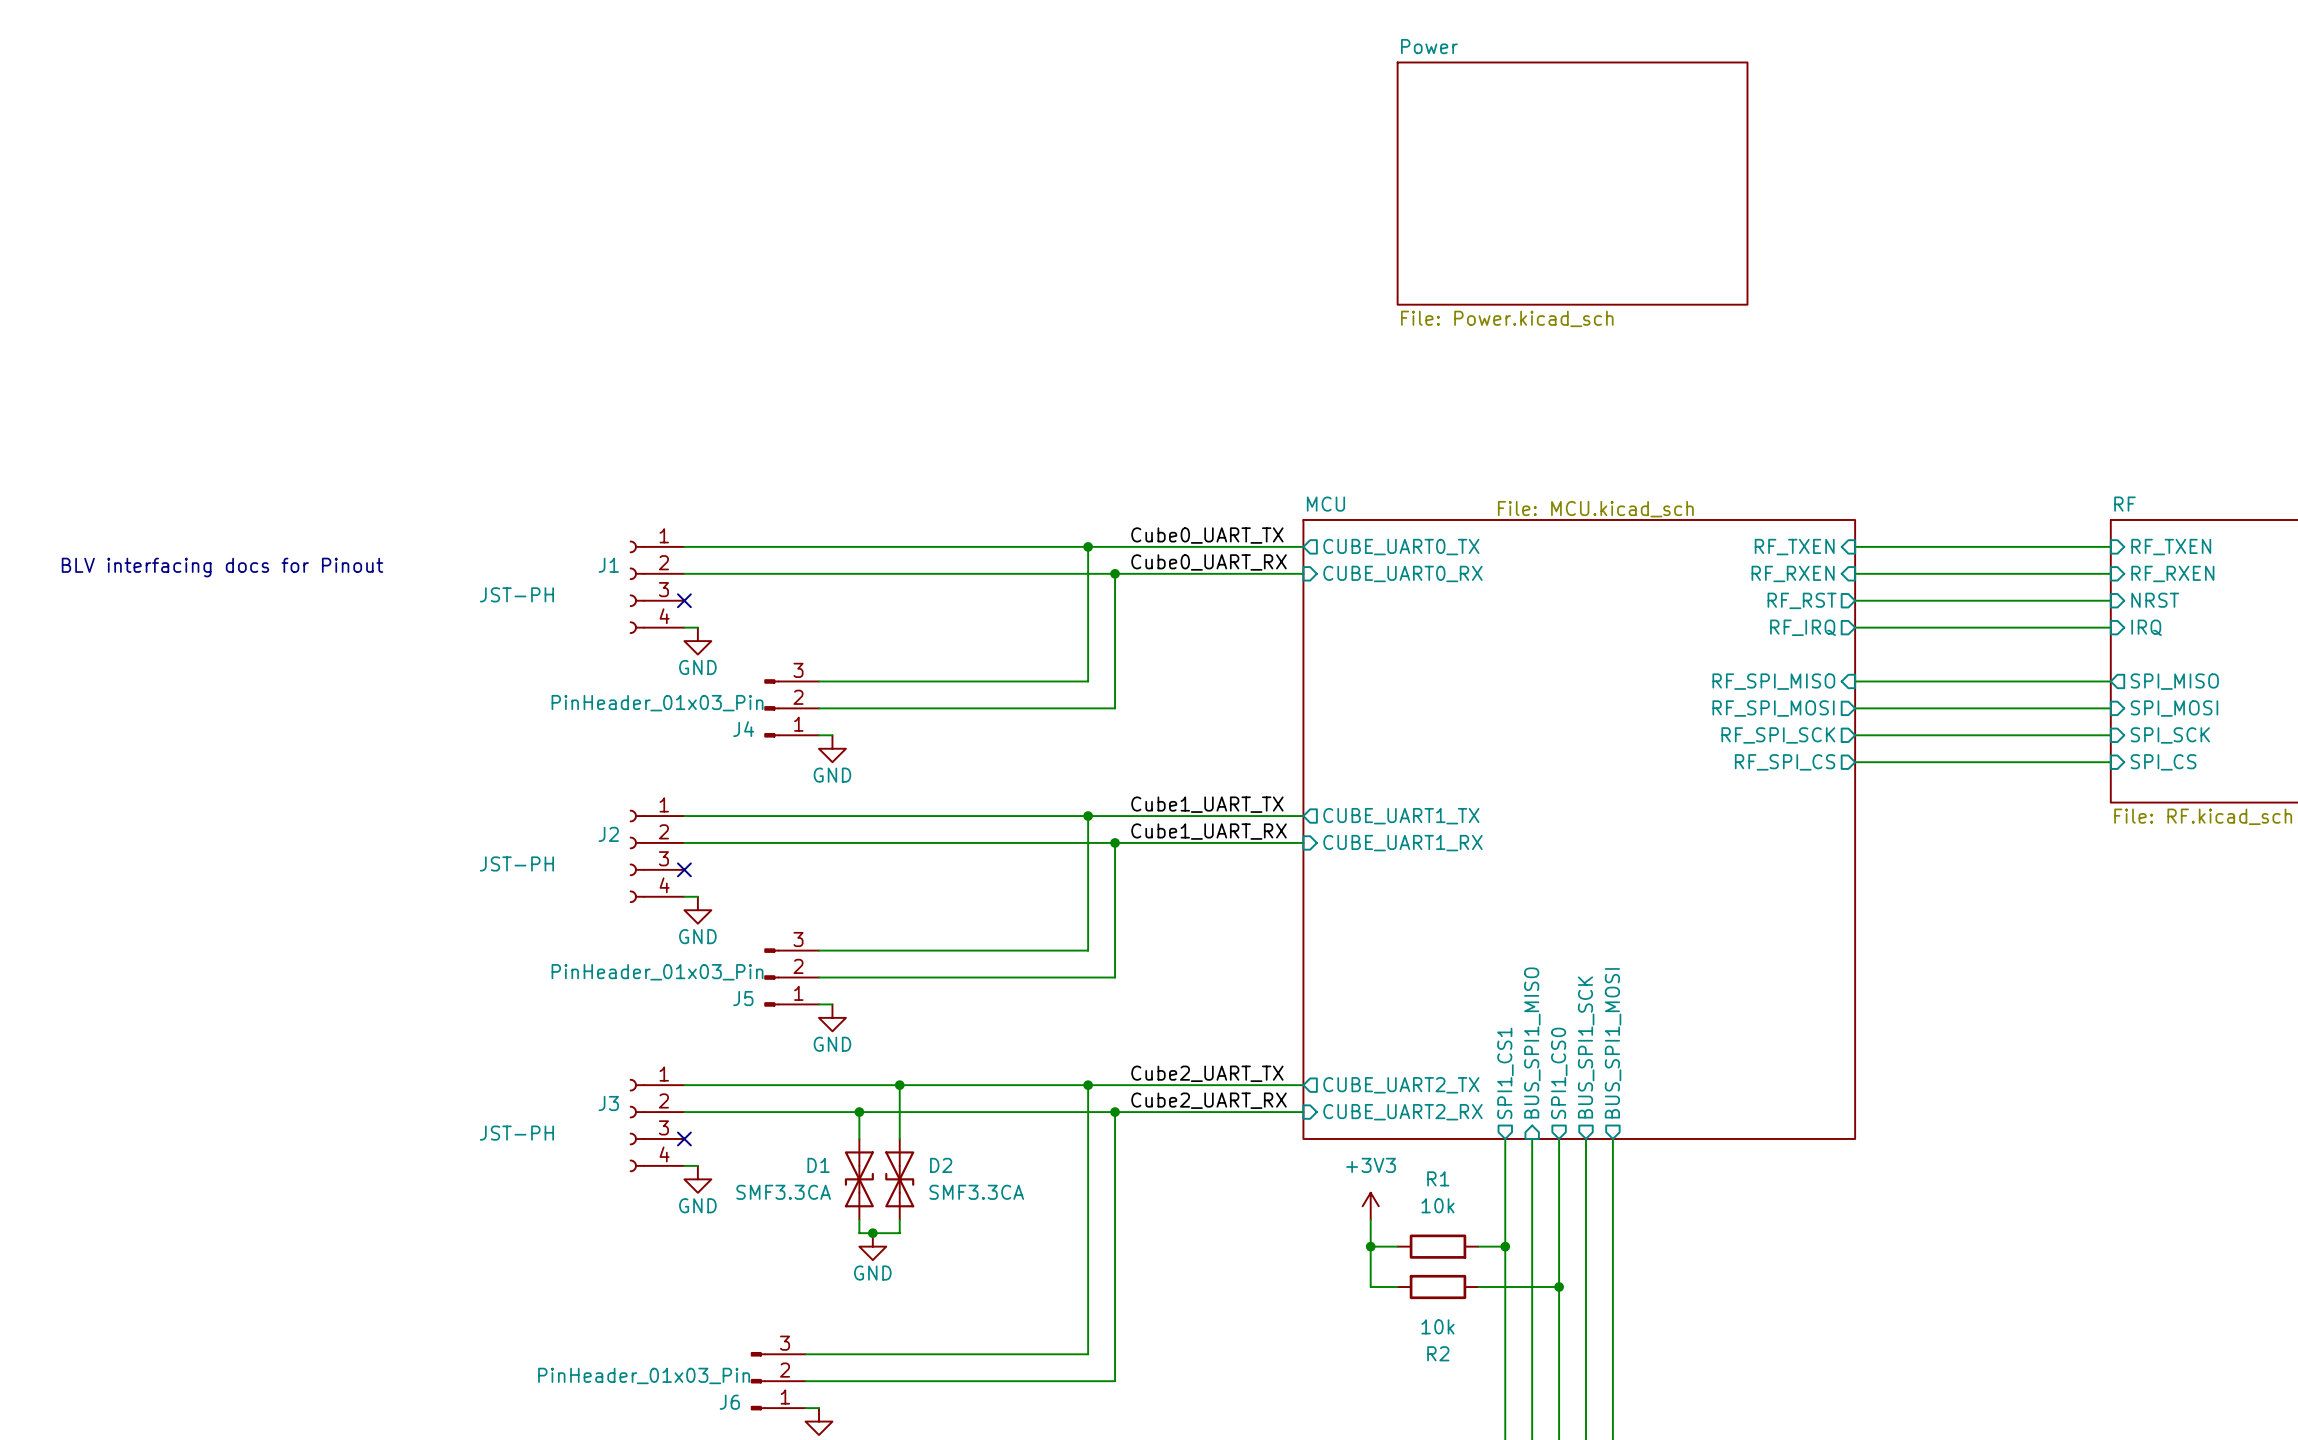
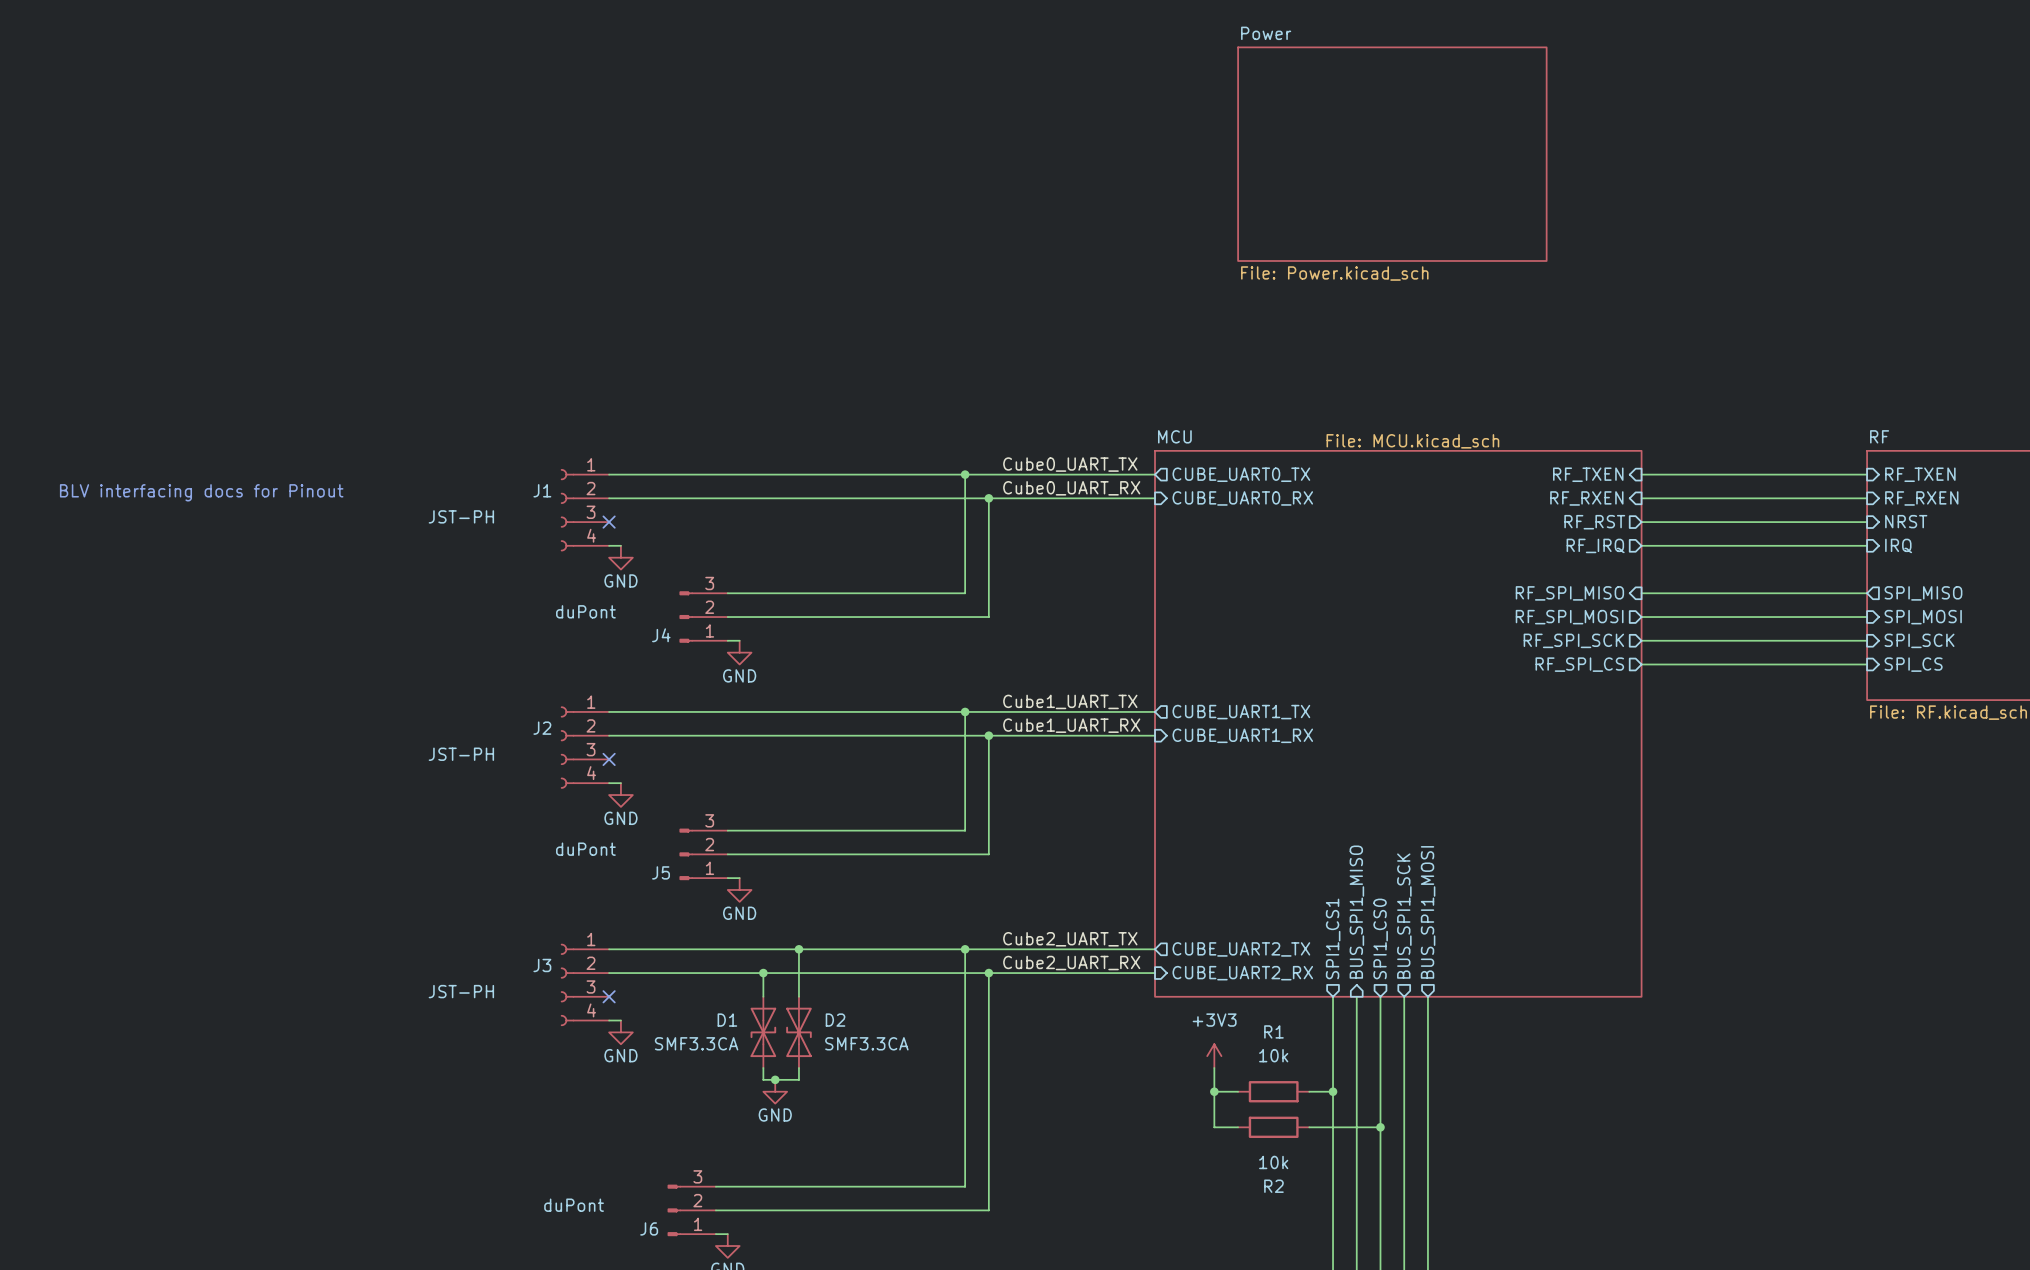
J4 value: PinHeader_01x03_Pin (657, 703) -> duPont (585, 611)
J5 value: PinHeader_01x03_Pin (657, 972) -> duPont (585, 849)
J6 value: PinHeader_01x03_Pin (644, 1375) -> duPont (574, 1205)

